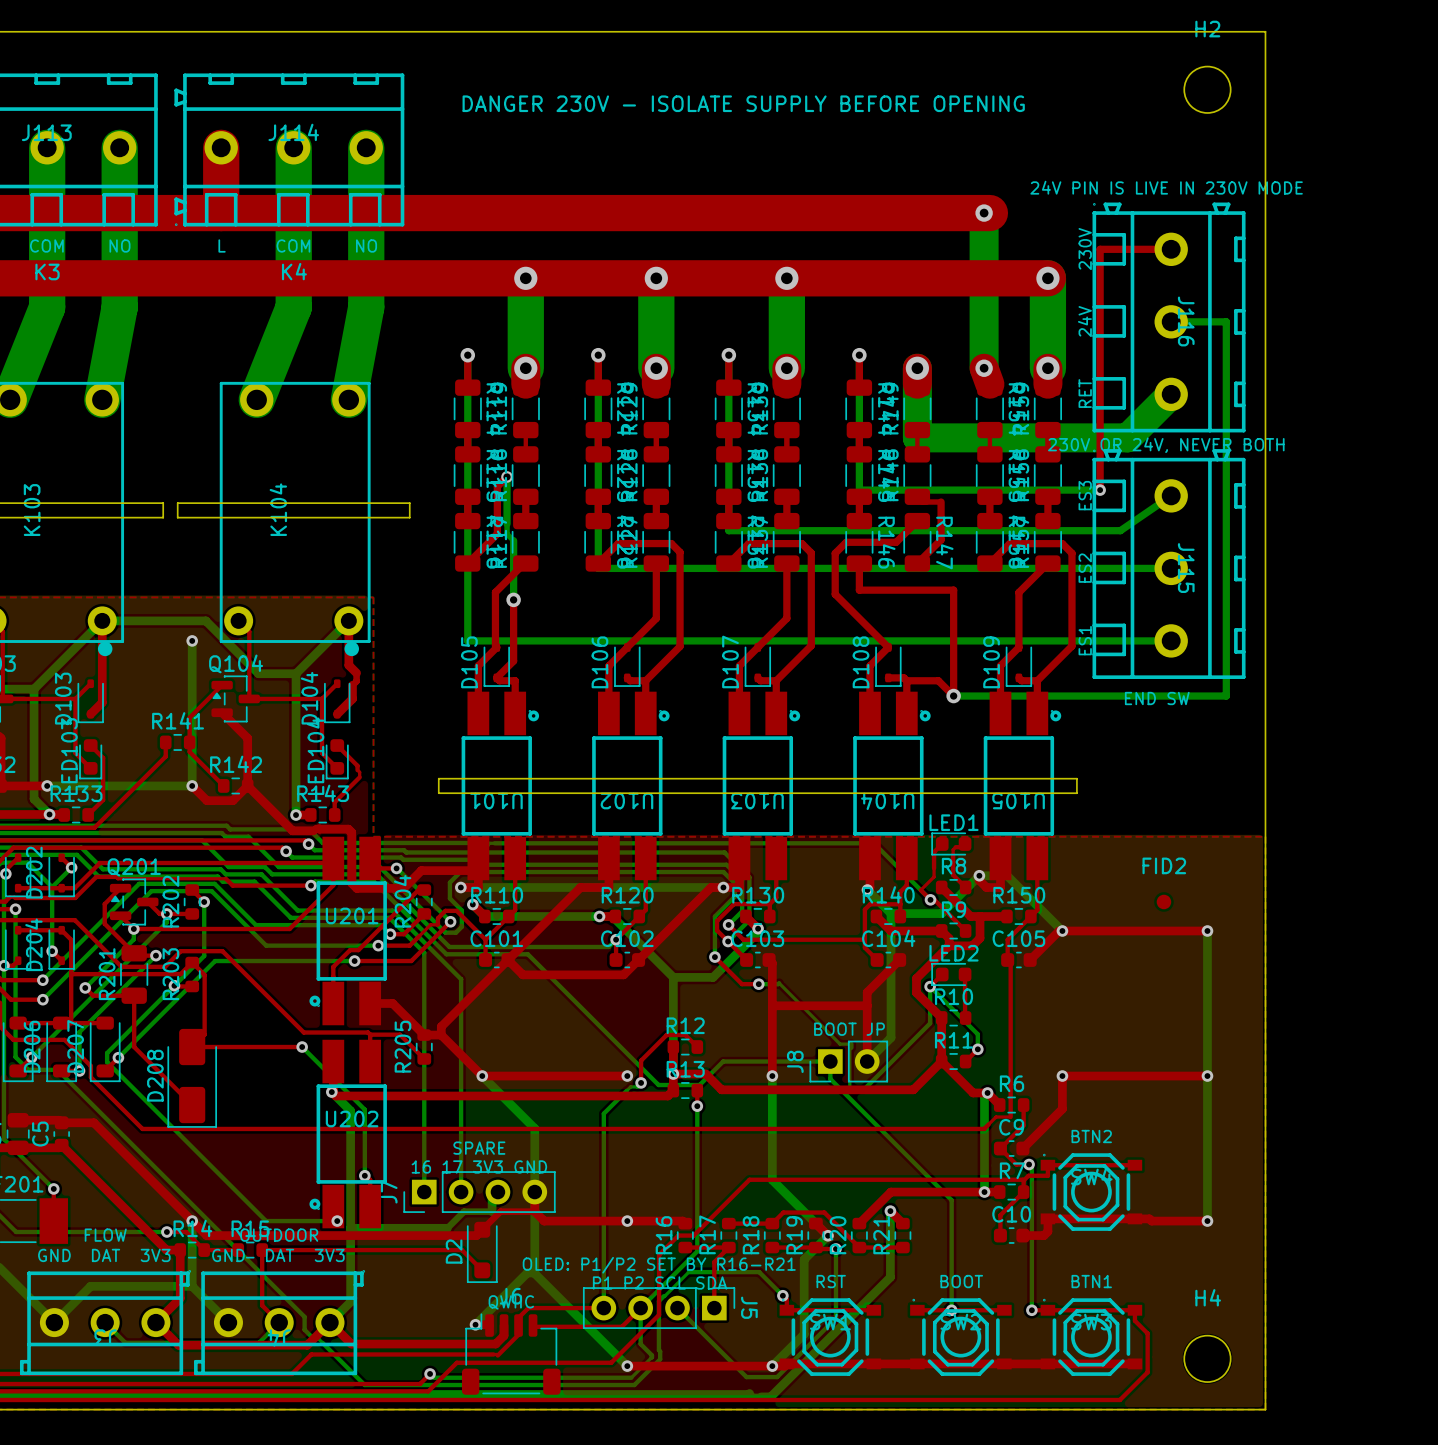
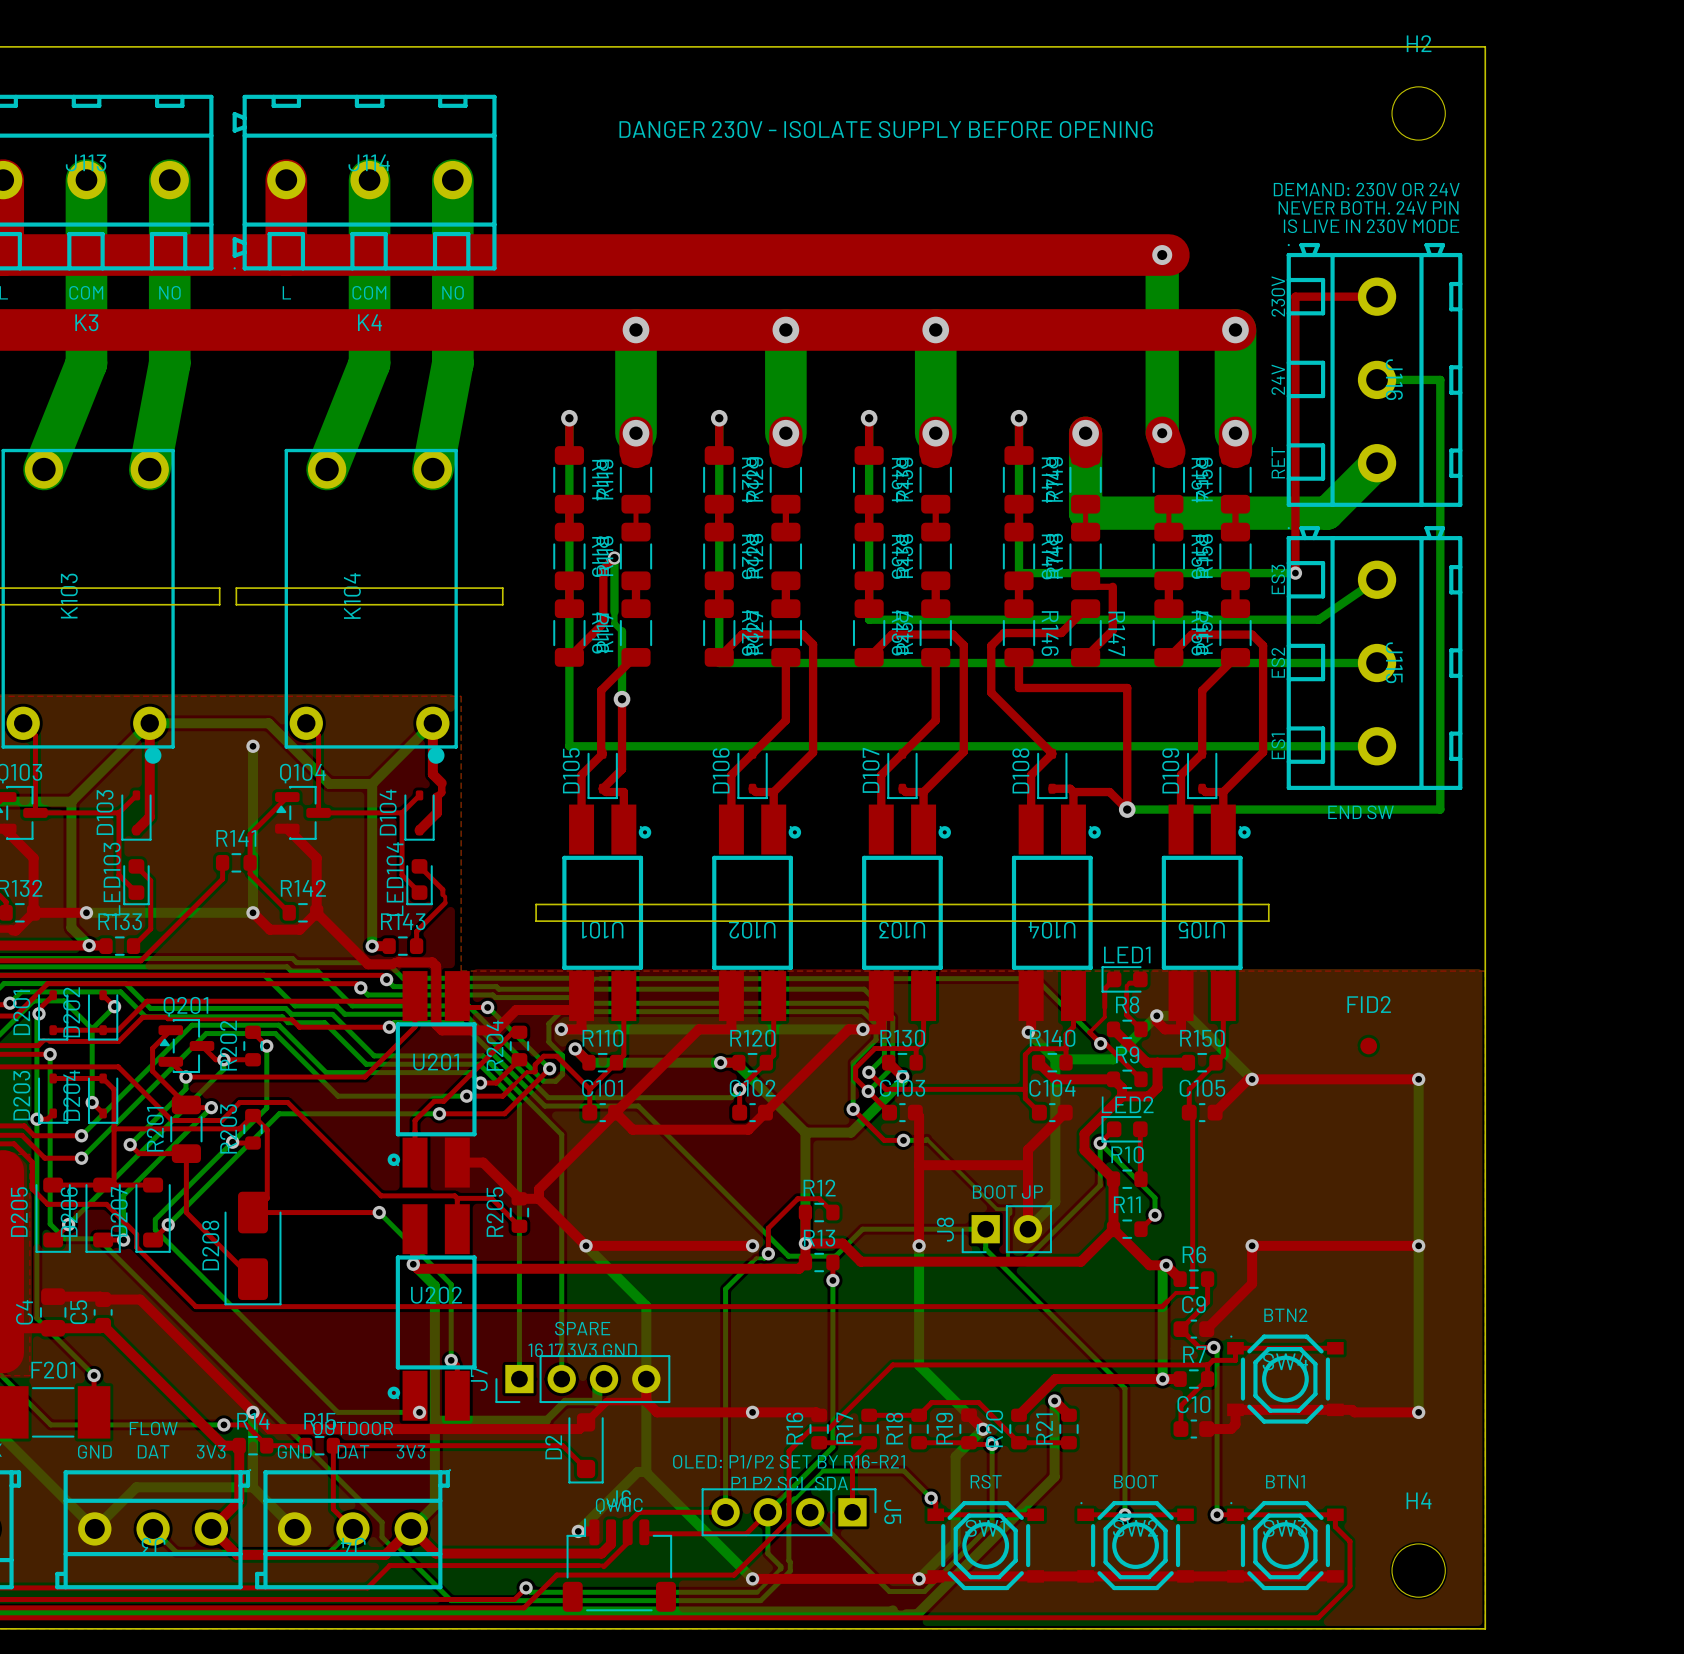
text: none -> DEMAND: 230V OR 24V (1366, 189)
text: none -> NEVER BOTH. 24V PIN (1368, 207)
text: 24V PIN IS LIVE IN 230V MODE (1166, 187) -> IS LIVE IN 230V MODE (1371, 226)
text: 230V OR 24V, NEVER BOTH (1166, 445) -> none

